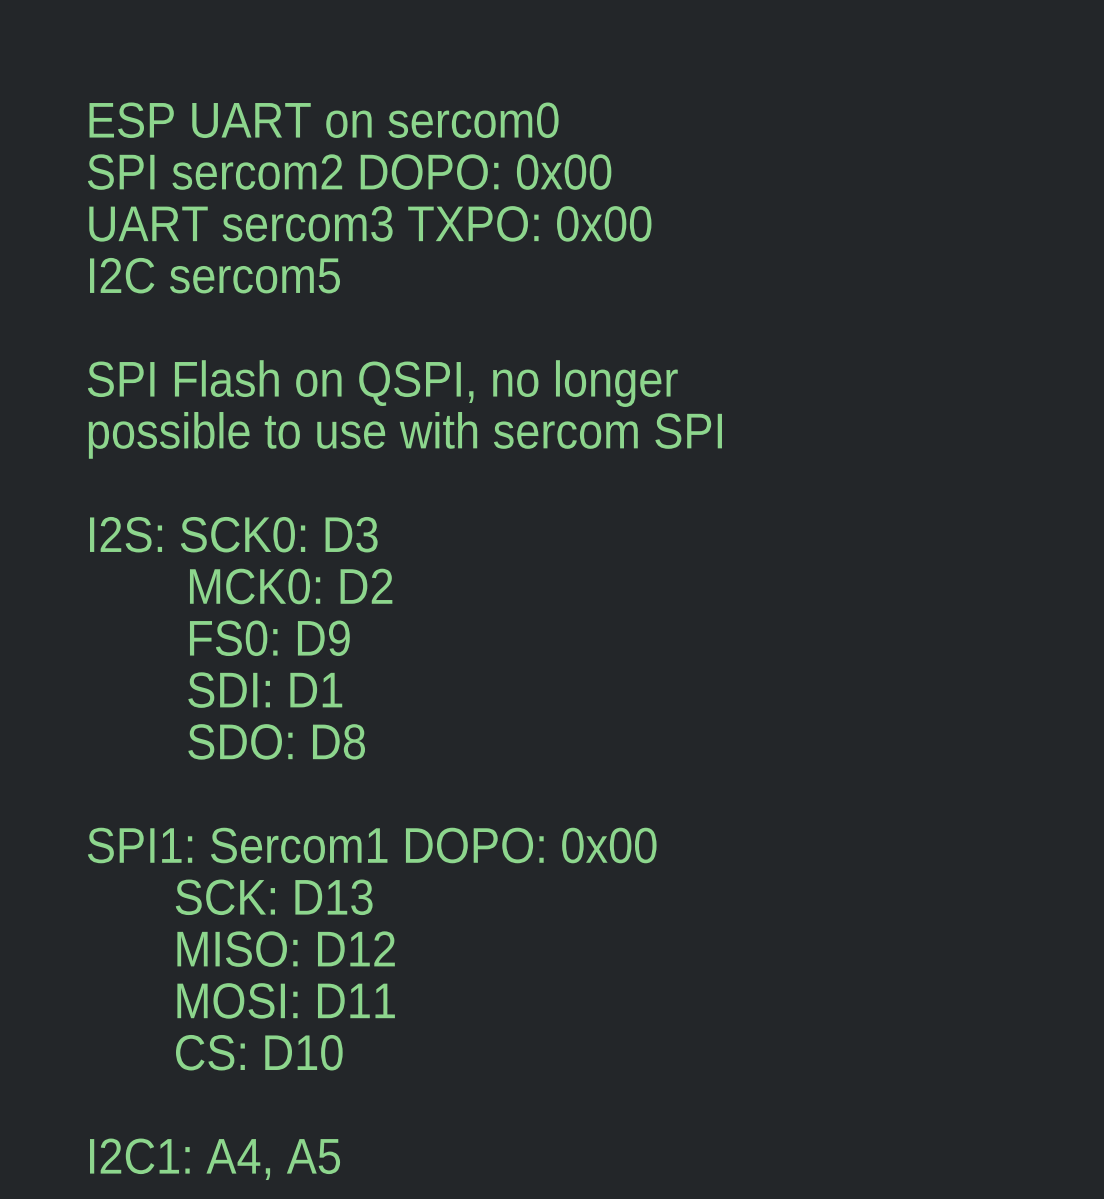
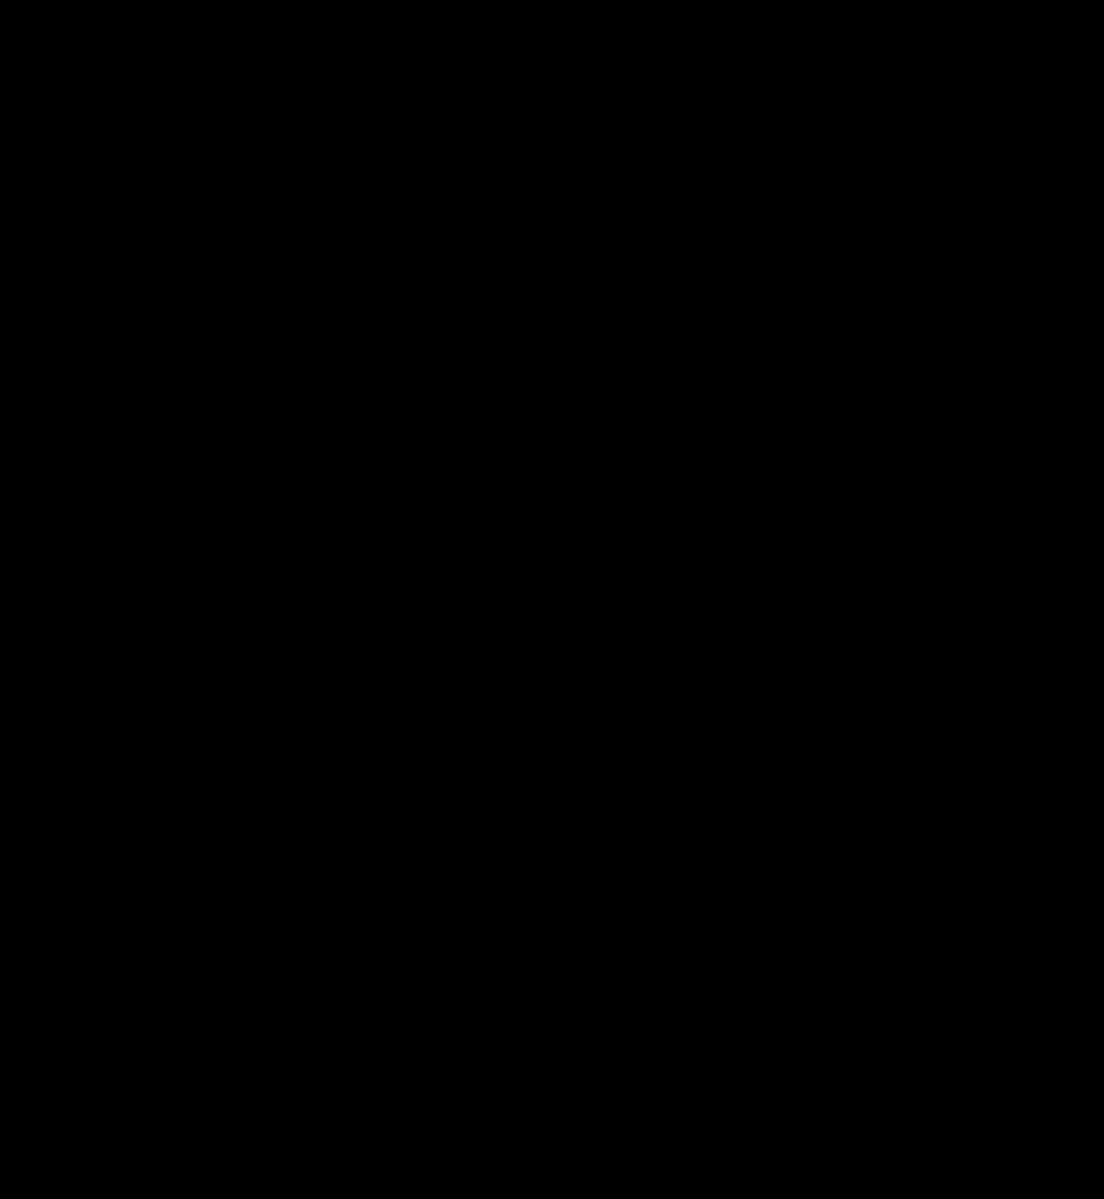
text: ESP UART on sercom0 (324, 120) -> none
text: SPI sercom2 DOPO: 0x00 (349, 172) -> none
text: UART sercom3 TXPO: 0x00 (370, 223) -> none
text: I2C sercom5 (215, 275) -> none
text: SPI Flash on QSPI, no longer (382, 383) -> none
text: possible to use with sercom SPI (405, 435) -> none
text: I2S: SCK0: D3 (233, 534) -> none
text: MCK0: D2 (291, 586) -> none
text: FS0: D9 (269, 638) -> none
text: SDI: D1 (265, 690) -> none
text: SDO: D8 (276, 741) -> none
text: SPI1: Sercom1 DOPO: 0x00 (372, 845) -> none
text: SCK: D13 (274, 897) -> none
text: MISO: D12 (286, 949) -> none
text: MOSI: D11 (286, 1000) -> none
text: CS: D10 (259, 1052) -> none
text: I2C1: A4, A5 (215, 1159) -> none

